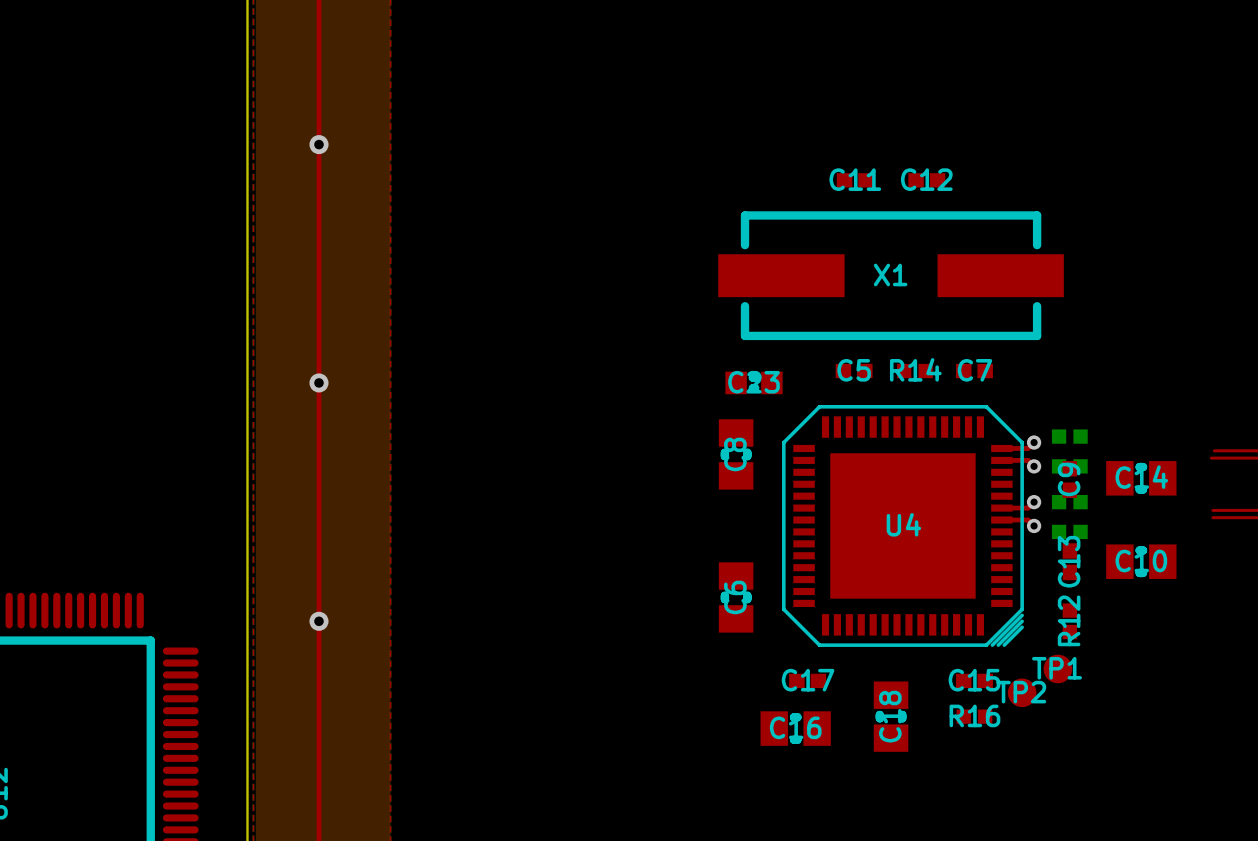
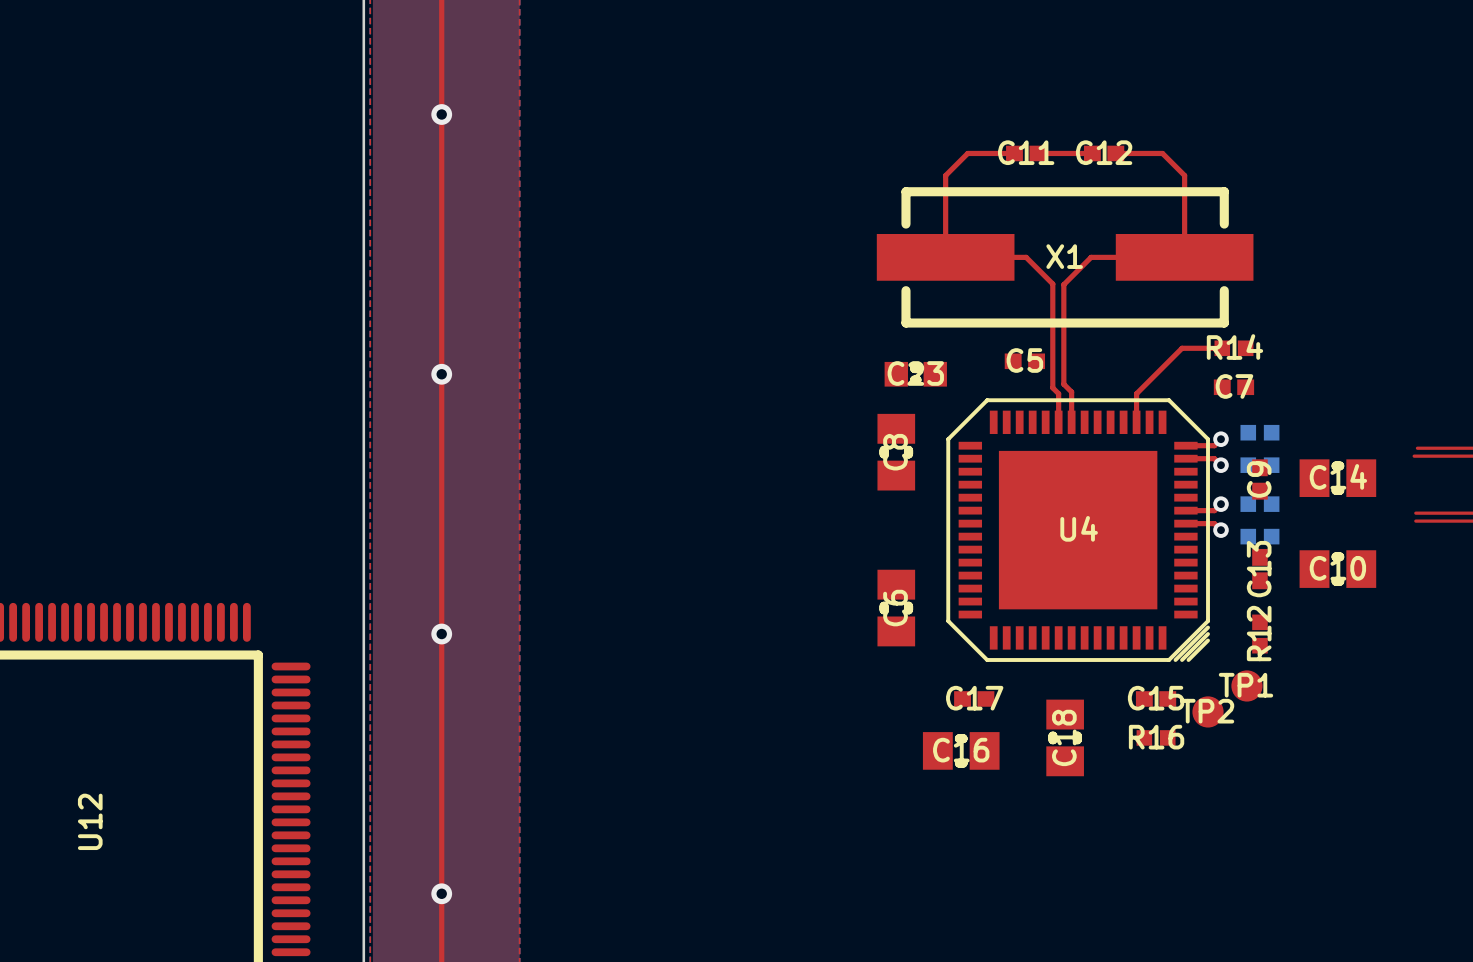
top track: none -> (1014, 153) (967, 153) (945, 175) (945, 257) (1026, 257) (1052, 284) (1052, 387) (1058, 393) (1058, 422)
top track: none -> (1037, 153) (1092, 153)
top track: none -> (1115, 153) (1162, 153) (1184, 175) (1184, 257) (1091, 257) (1063, 284) (1063, 384) (1071, 392) (1071, 422)
top track: none -> (1222, 348) (1182, 348) (1136, 393) (1136, 422)
R14 position: (914, 371) -> (1233, 348)
C7 position: (974, 371) -> (1233, 387)

